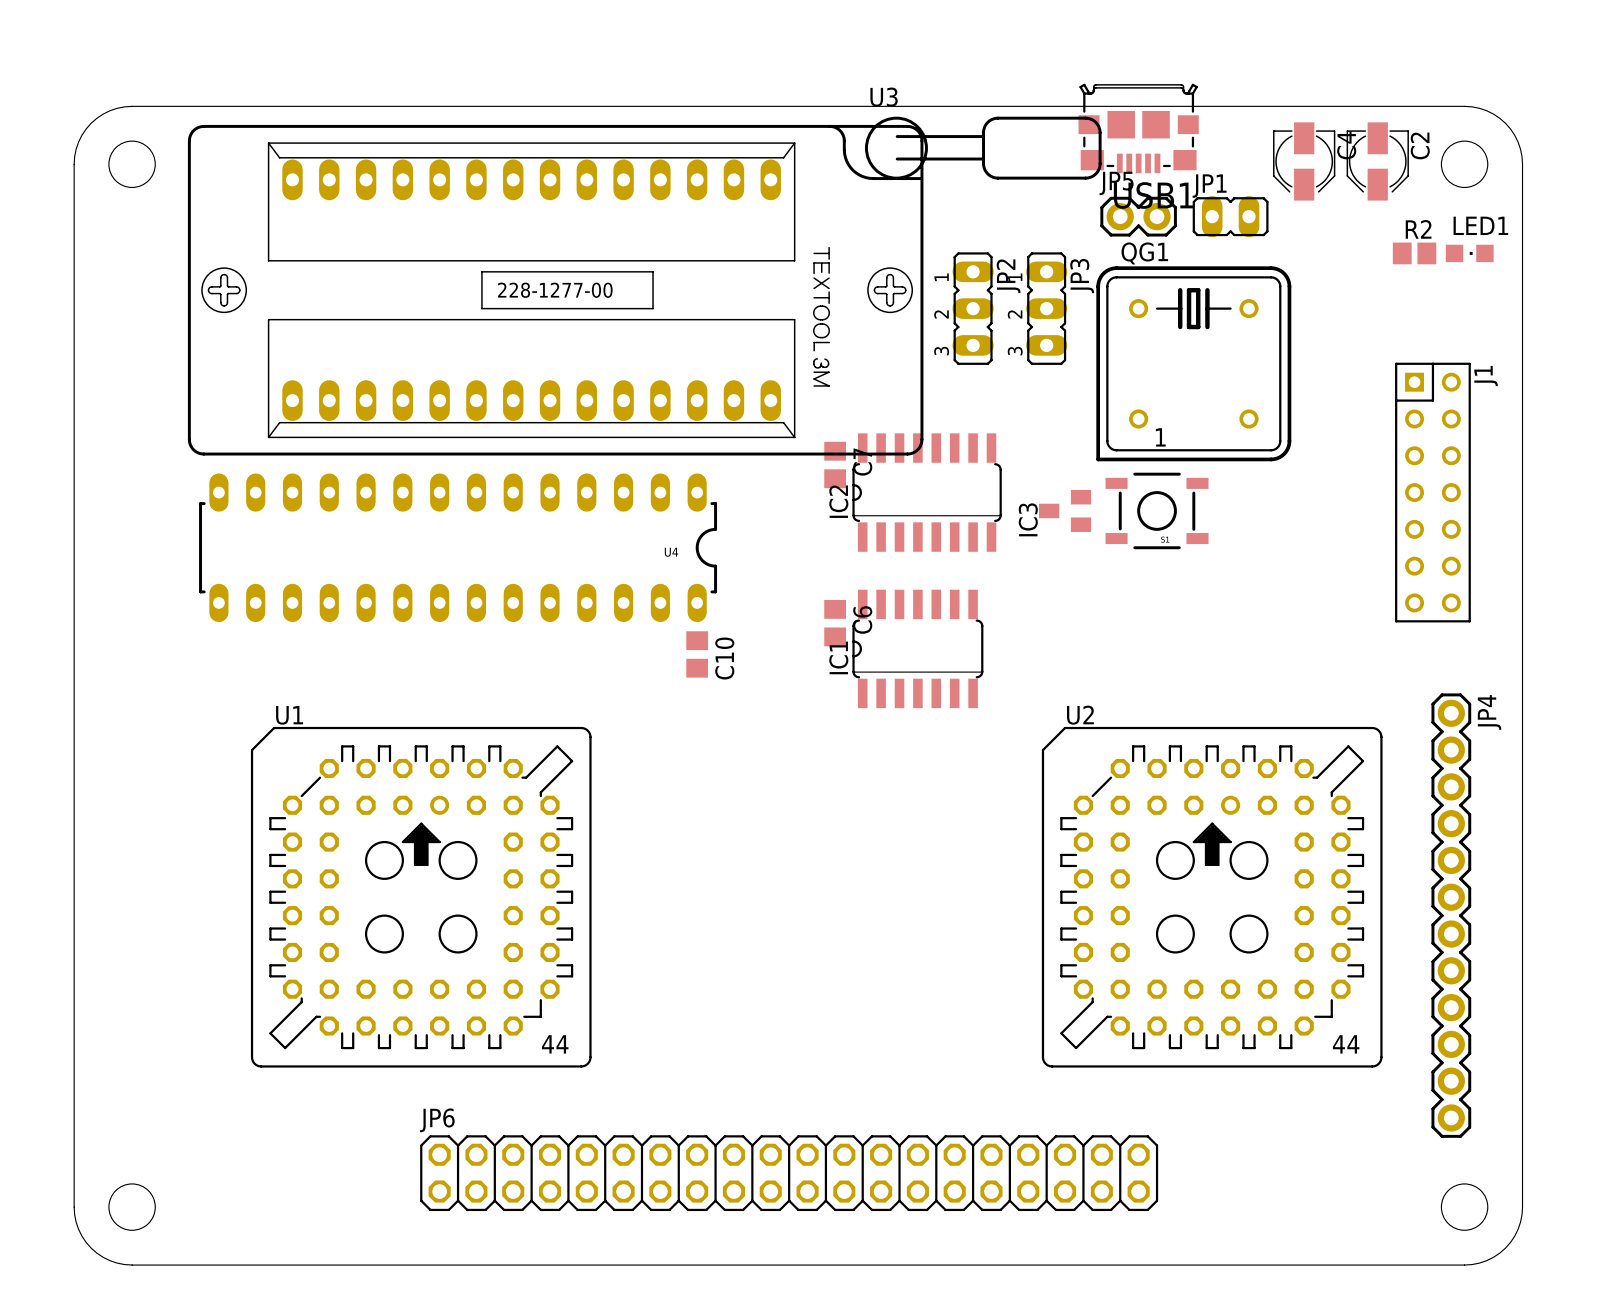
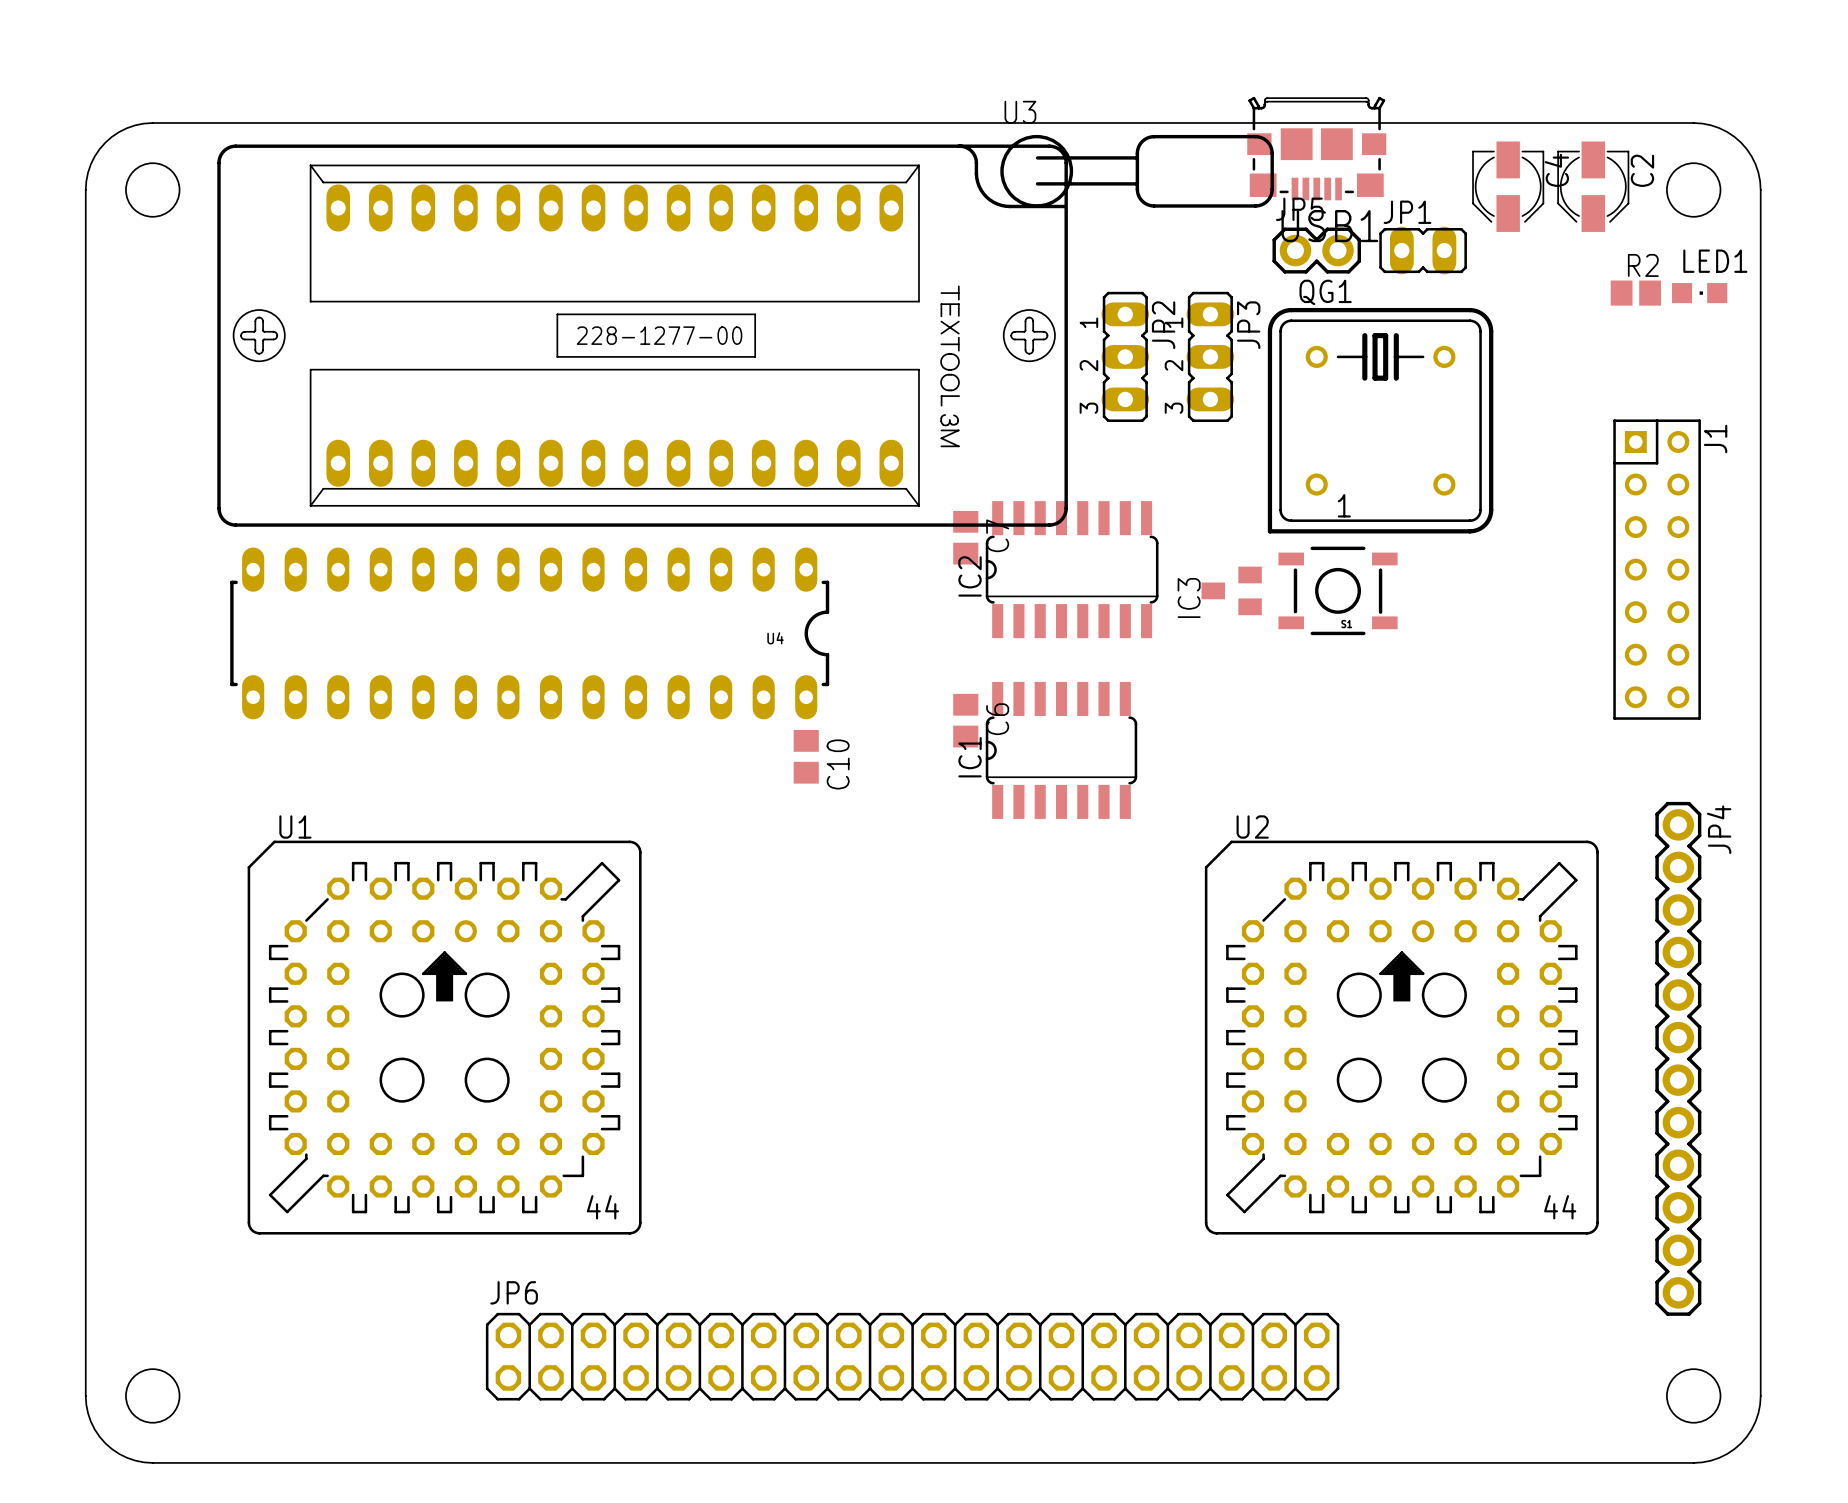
U1 position: (421, 897) -> (444, 1037)

